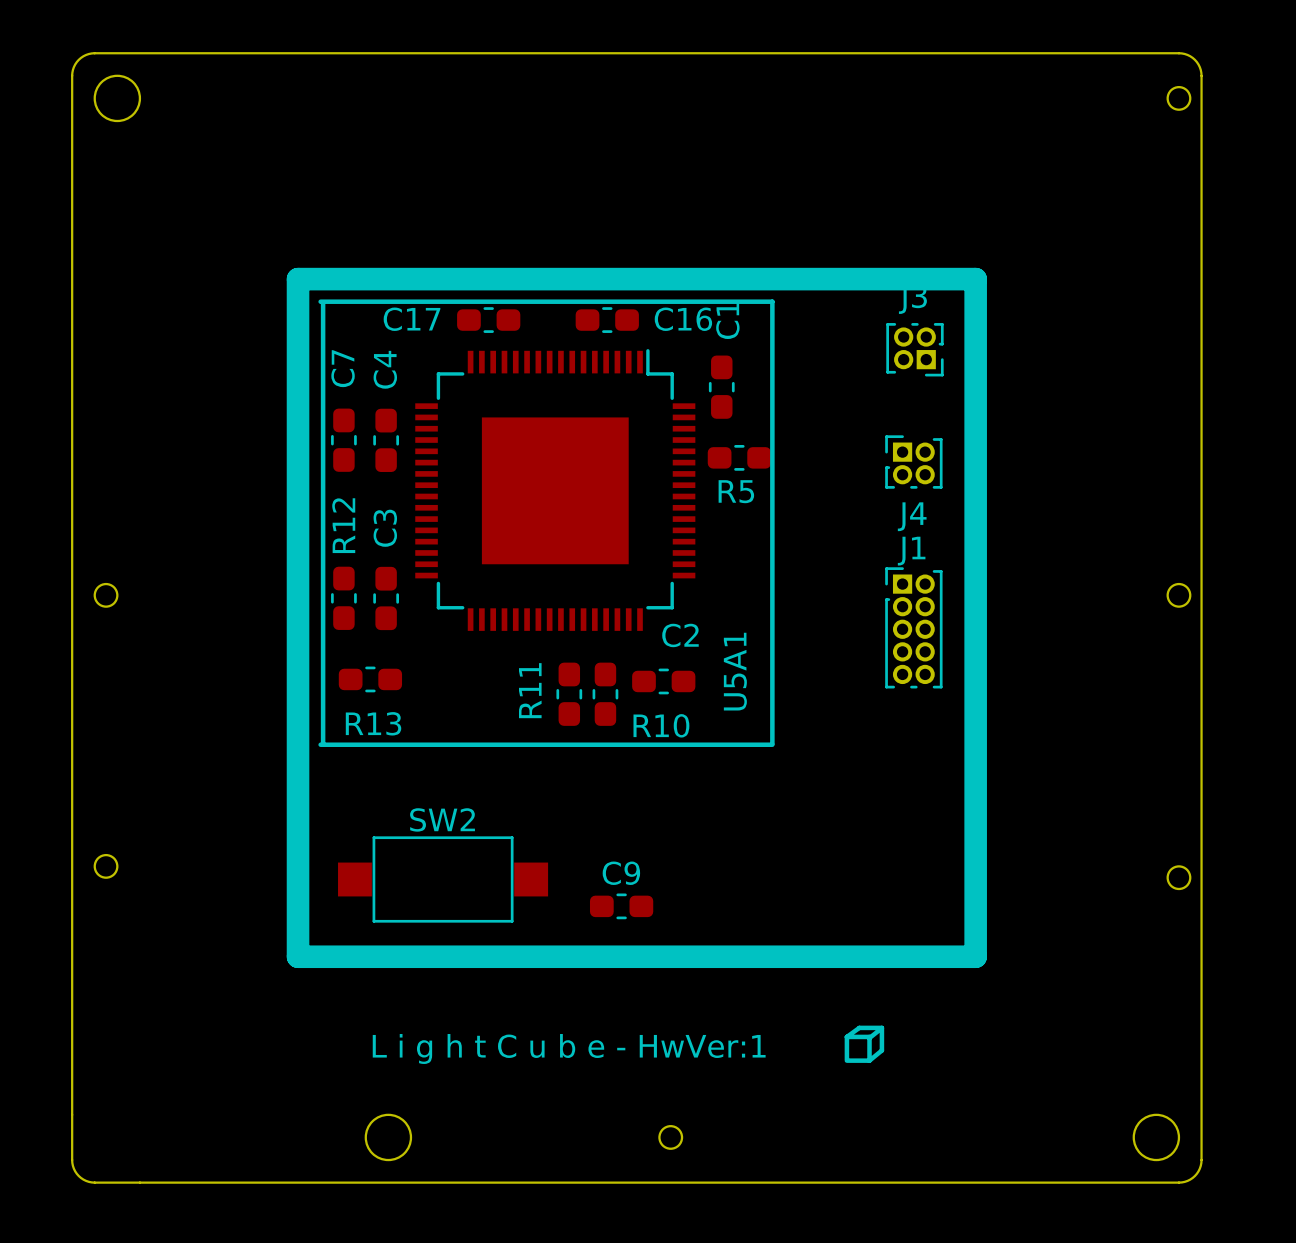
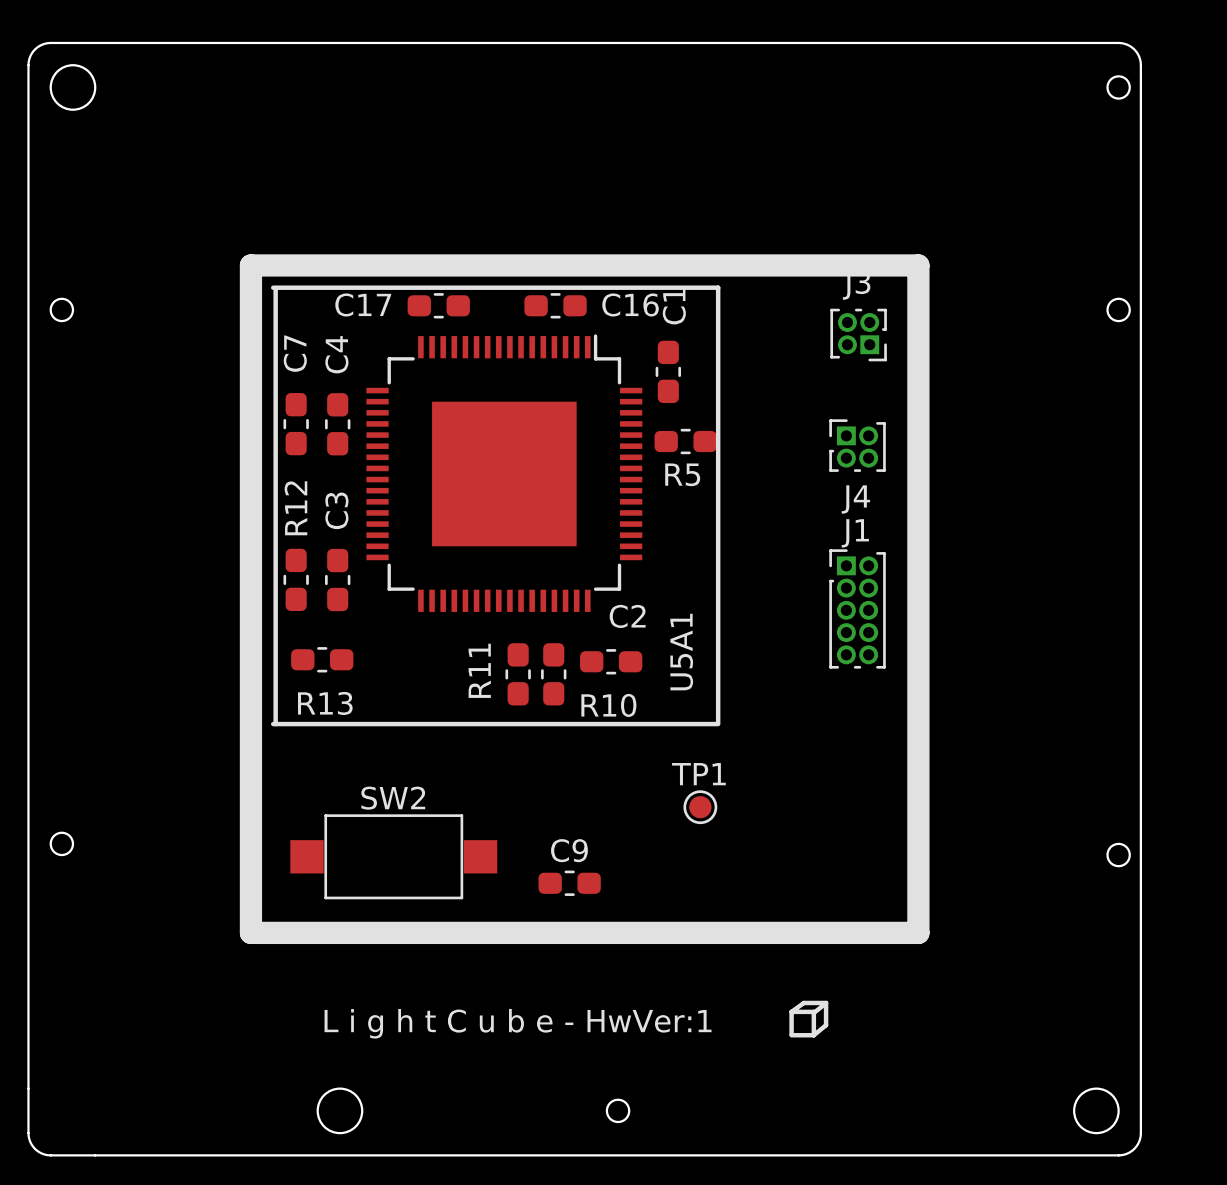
round board edge position: (106, 595) -> (61, 309)
round board edge position: (1178, 595) -> (1118, 309)
TP1: none -> (700, 807)

